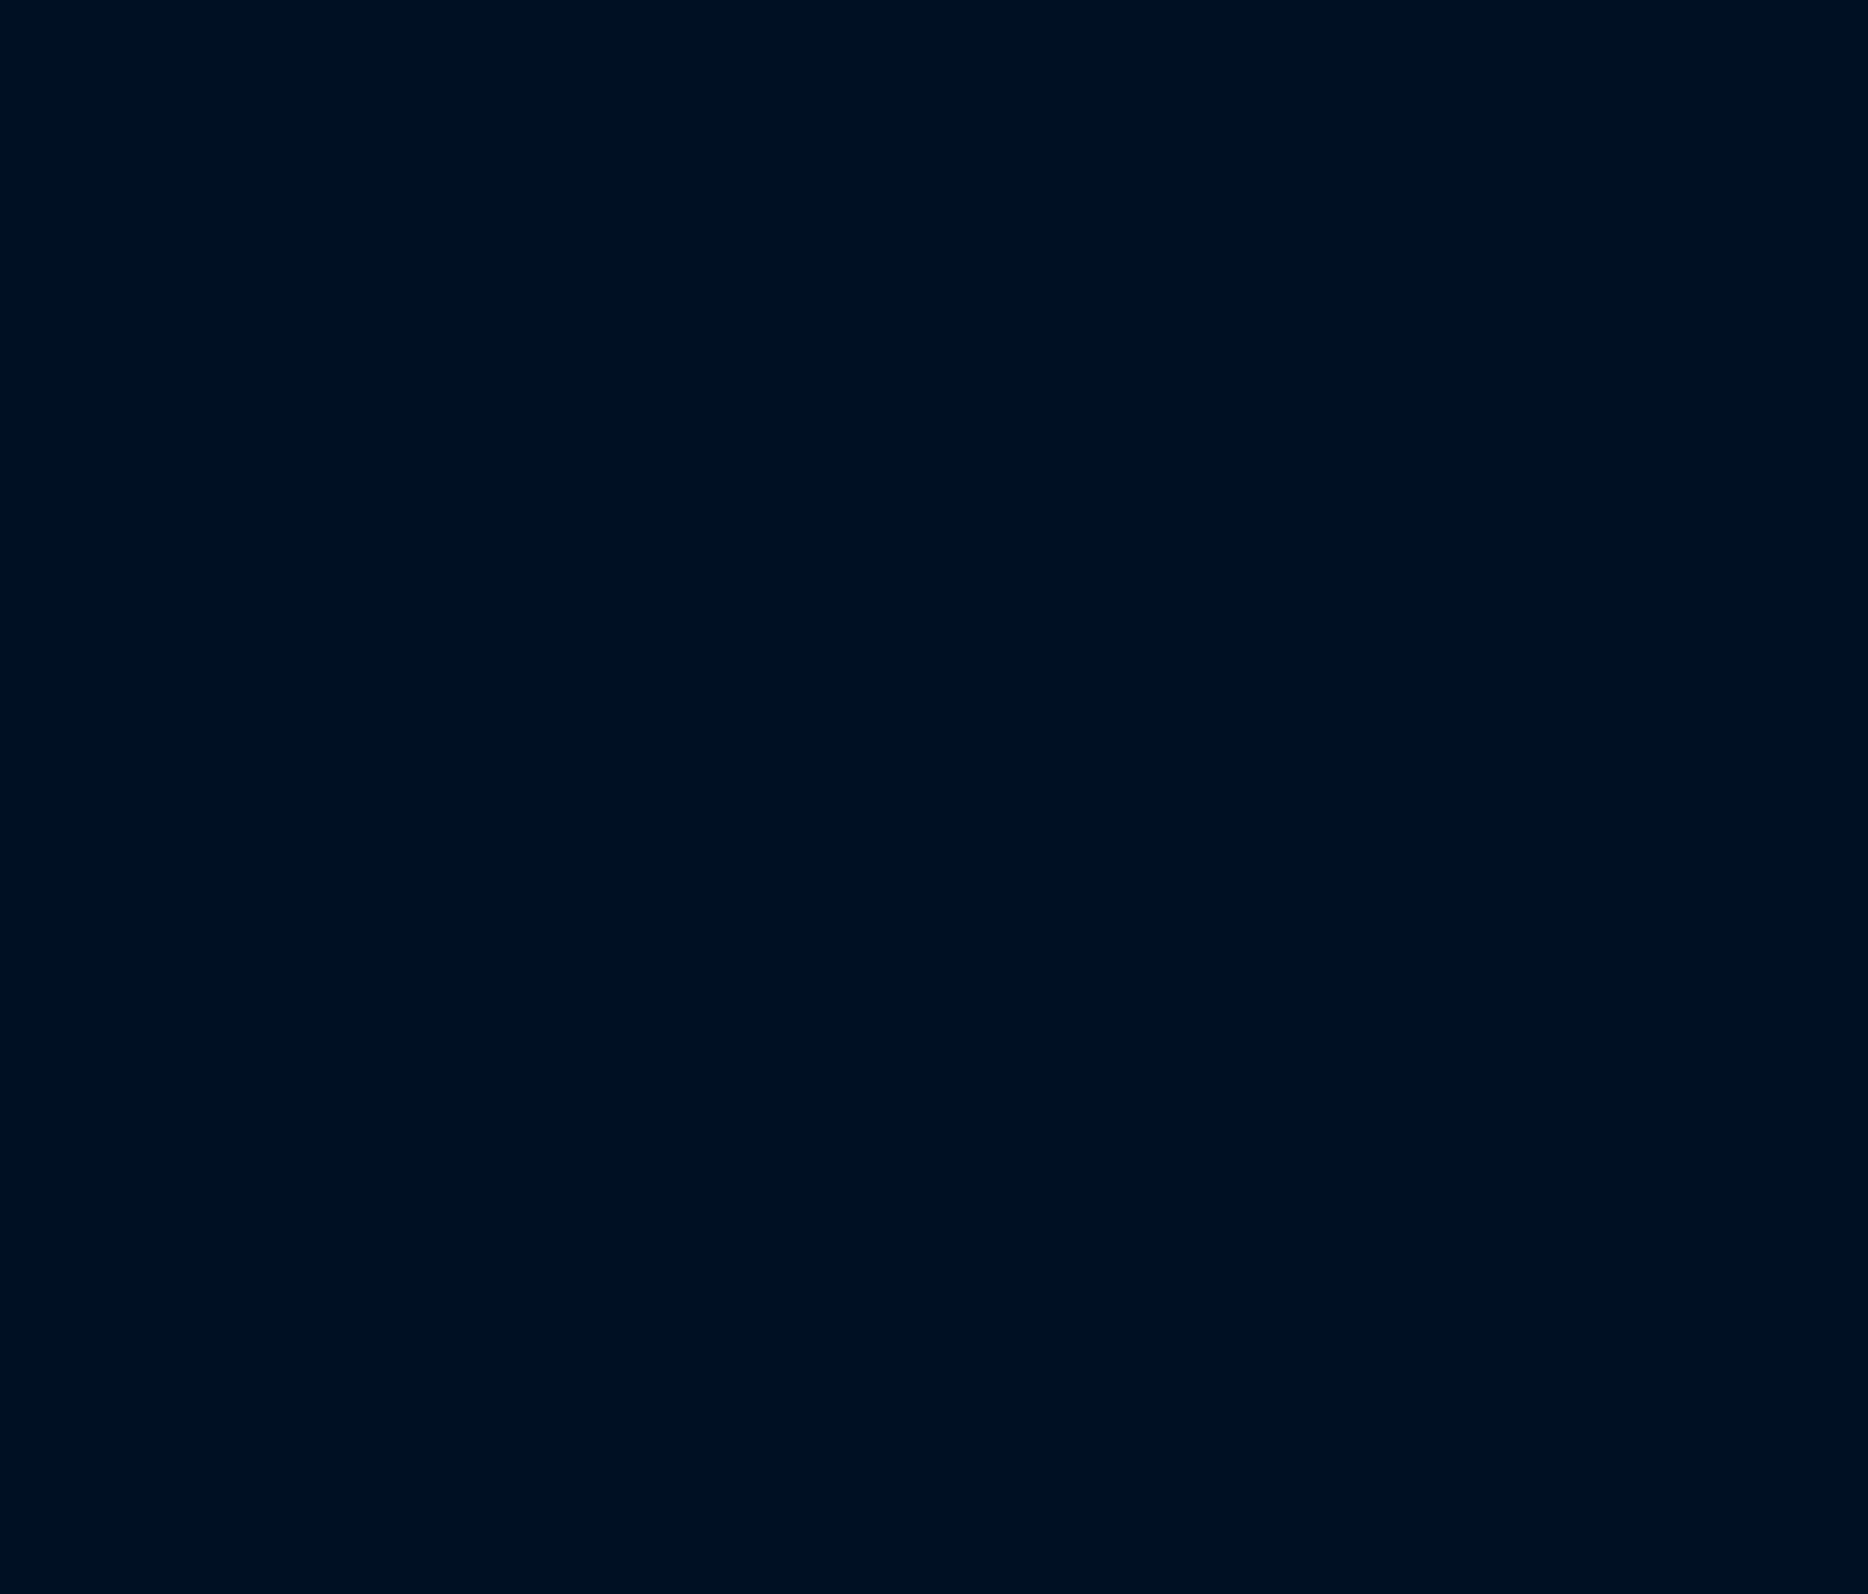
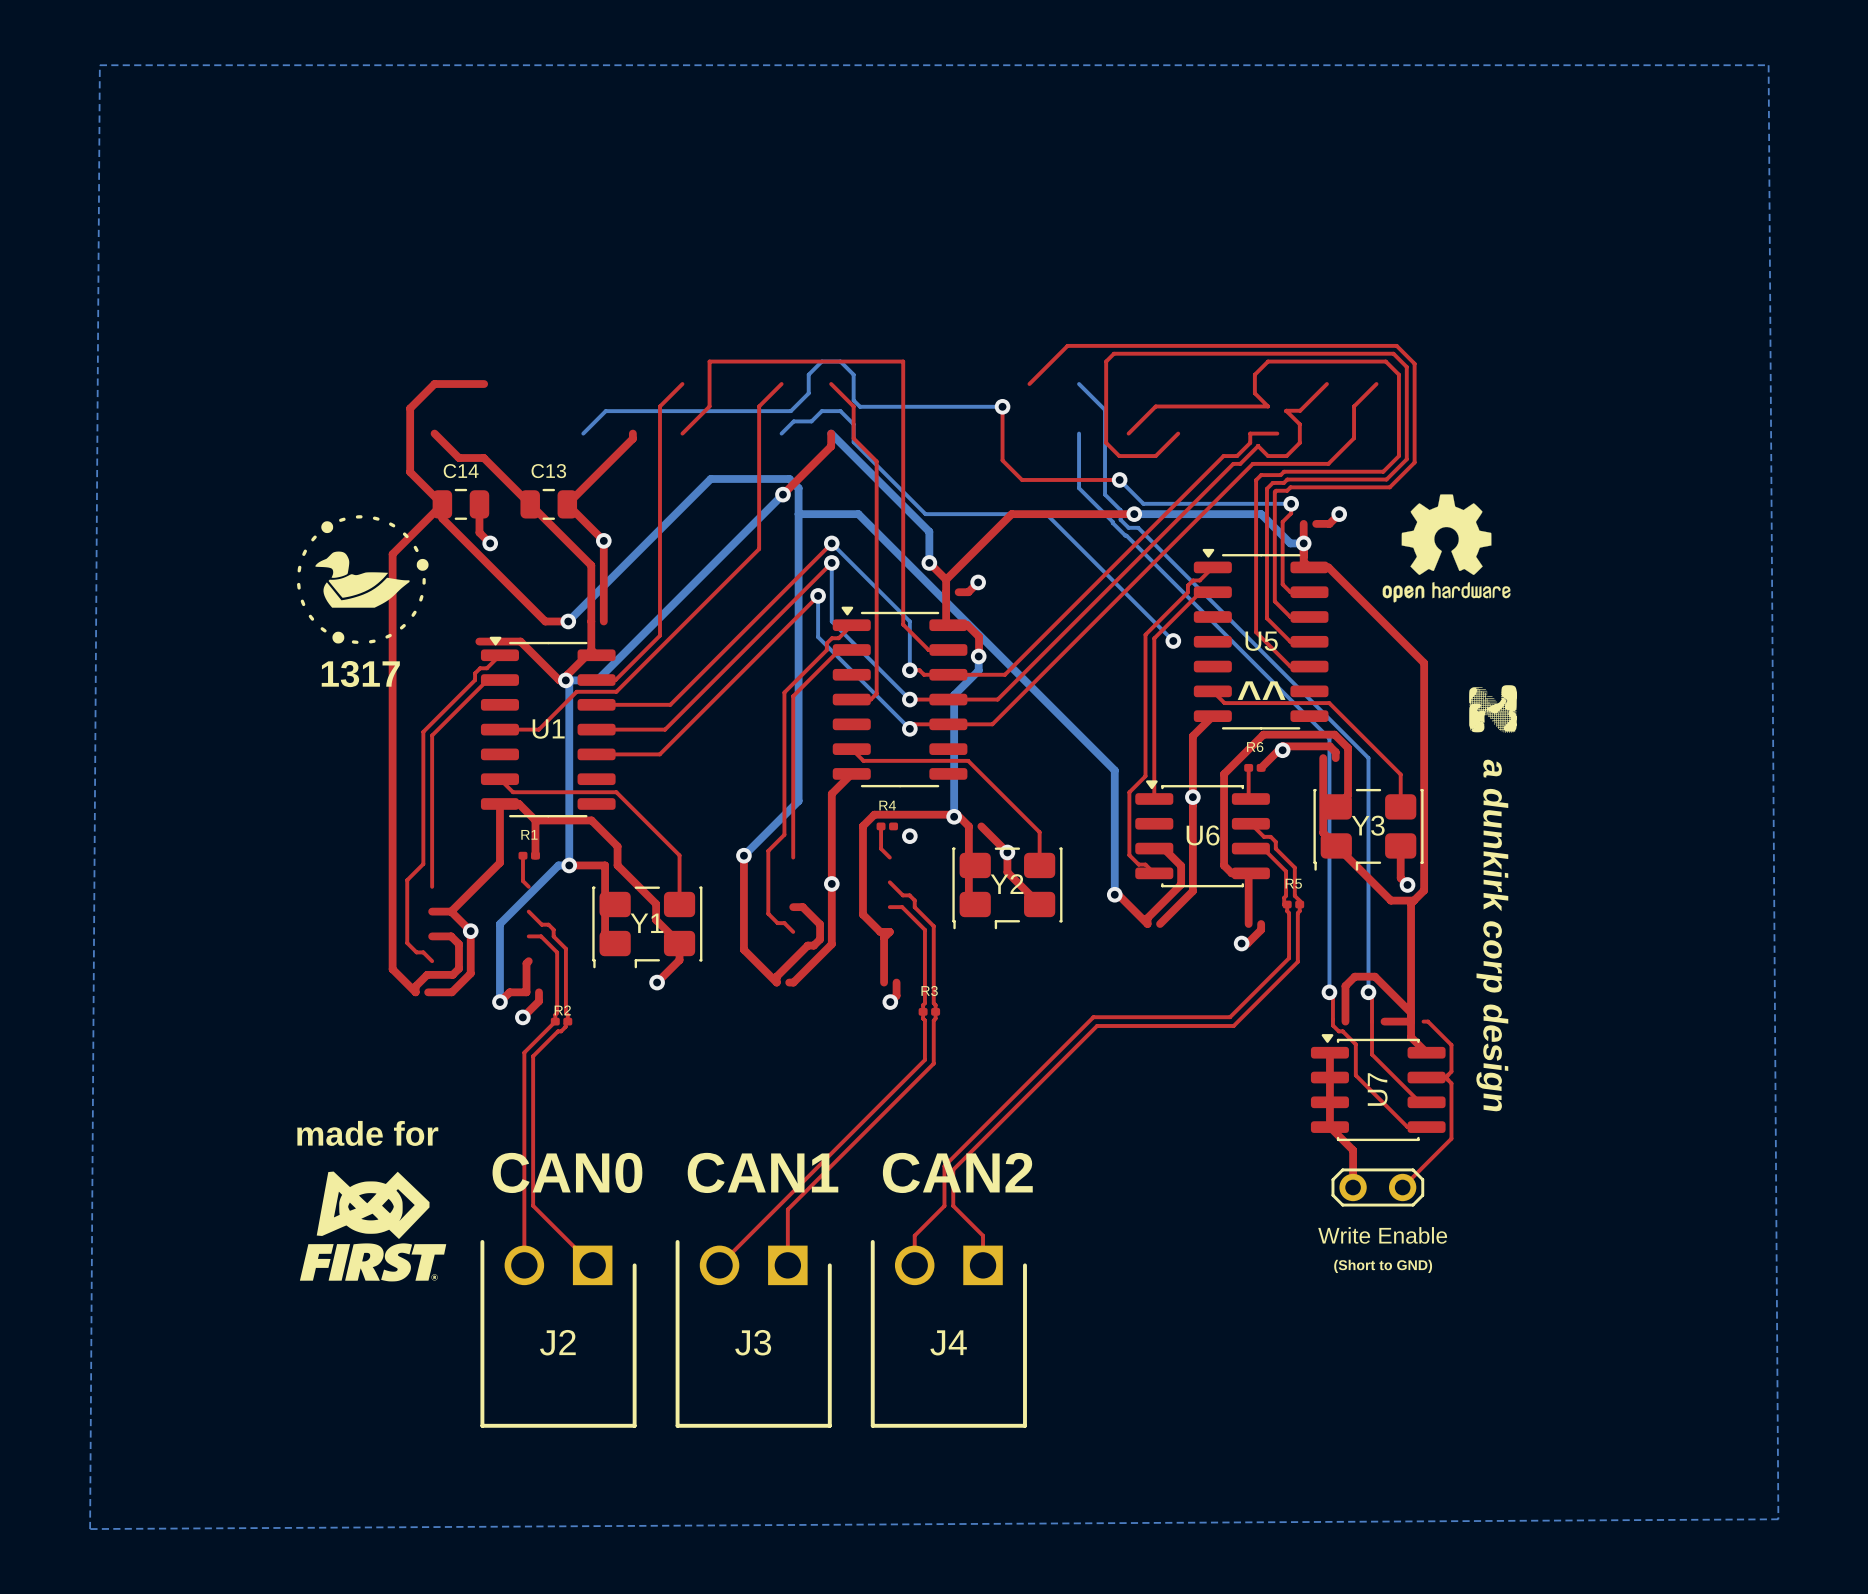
bottom zone outline: none -> (99, 65) (1768, 65) (1778, 1519) (90, 1529) (99, 65)
top track: none -> (484, 384) (434, 384) (410, 408) (410, 472) (442, 504)
top track: none -> (682, 384) (659, 406) (659, 635) (615, 680) (596, 680)
top track: none -> (781, 384) (759, 406) (759, 549) (616, 691) (576, 691) (538, 729) (499, 729)
top track: none -> (831, 384) (853, 406) (853, 438) (876, 461) (876, 693) (870, 699) (851, 699)
top track: none -> (1029, 384) (1067, 345) (1396, 345) (1414, 363) (1414, 462) (1389, 487) (1290, 487) (1287, 490) (1274, 492) (1274, 601) (1290, 616) (1309, 616)
bottom track: none -> (1079, 384) (1105, 409) (1105, 494) (1120, 510) (1120, 519) (1128, 527) (1138, 527) (1368, 758) (1368, 992)
top track: none -> (1326, 384) (1300, 410) (1286, 410)
top track: none -> (1376, 384) (1354, 406) (1354, 438) (1328, 463) (1252, 463) (992, 724) (914, 724) (909, 728)
top track: none -> (1002, 406) (1002, 460) (1022, 479) (1119, 479)
bottom track: none -> (1002, 406) (860, 406) (853, 400) (853, 374) (840, 361) (821, 361) (808, 374) (808, 393) (790, 411) (605, 411) (583, 433)
via: none -> (1002, 406)
top track: none -> (1286, 411) (1299, 424) (1299, 442) (1286, 456) (1268, 456) (1258, 446)
top track: none -> (434, 433) (458, 458) (483, 458) (591, 565) (591, 649) (596, 655) (587, 655) (567, 674) (565, 680) (559, 680) (520, 641) (479, 641)
top track: none -> (632, 433) (632, 438) (567, 504) (603, 540) (603, 621)
top track: none -> (682, 433) (709, 406) (709, 361) (903, 361) (903, 624) (928, 649) (948, 649)
bottom track: none -> (781, 433) (793, 421) (811, 421) (821, 411) (840, 411) (853, 424) (853, 442) (925, 514) (1046, 514) (1173, 641)
top track: none -> (831, 433) (831, 446) (782, 494)
bottom track: none -> (831, 433) (929, 531) (929, 562)
bottom track: none -> (1079, 433) (1079, 488) (1329, 738) (1329, 992)
top track: none -> (1128, 433) (1155, 406) (1268, 406) (1254, 393) (1254, 374) (1268, 361) (1385, 361) (1398, 374) (1398, 456) (1383, 471) (1284, 471) (1280, 475) (1261, 475) (1256, 480) (1256, 632) (1290, 666) (1309, 666)
top track: none -> (1178, 433) (1155, 456) (1119, 456) (1106, 442) (1106, 361) (1113, 353) (1393, 353) (1406, 367) (1406, 459) (1386, 479) (1287, 479) (1283, 482) (1272, 482) (1266, 488) (1266, 618) (1290, 641) (1309, 641)
top track: none -> (1277, 433) (1250, 433) (1250, 442) (1237, 456) (1223, 456) (1004, 674) (924, 674) (919, 670) (909, 670)
top track: none -> (1258, 446) (1240, 463) (1233, 463) (997, 699) (909, 699)
bottom track: none -> (1119, 479) (1143, 503) (1291, 503)
via: none -> (1119, 479)
bottom track: none -> (782, 494) (597, 680) (565, 680) (569, 683) (569, 865) (558, 865) (499, 924) (499, 1002)
via: none -> (782, 494)
drawing: none -> [1382, 494, 1511, 603]
top track: none -> (1291, 503) (1291, 513) (1282, 521) (1282, 584) (1290, 592) (1309, 592)
via: none -> (1291, 503)
top track: none -> (442, 504) (442, 518) (545, 621) (568, 621)
top track: none -> (442, 504) (392, 554) (392, 969) (415, 992) (415, 986) (427, 974) (452, 974) (458, 968) (458, 944) (451, 936) (432, 936)
C14: none -> (460, 504)
top track: none -> (479, 504) (479, 532) (490, 543)
C13: none -> (548, 504)
bottom track: none -> (798, 514) (858, 514) (1114, 770) (1114, 894)
top track: none -> (1134, 514) (1011, 514) (946, 579)
bottom track: none -> (1134, 514) (1261, 514) (1290, 543) (1303, 543)
via: none -> (1134, 514)
top track: none -> (1339, 514) (1329, 523) (1316, 523)
via: none -> (1339, 514)
drawing: none -> [297, 515, 429, 644]
top track: none -> (1303, 523) (1303, 561) (1309, 567) (1328, 567) (1424, 663) (1424, 890) (1411, 903) (1411, 1037) (1426, 1052)
via: none -> (603, 540)
via: none -> (490, 543)
top track: none -> (831, 543) (670, 704) (596, 704)
bottom track: none -> (831, 543) (909, 621) (909, 670)
via: none -> (831, 543)
via: none -> (1303, 543)
top track: none -> (831, 562) (665, 729) (596, 729)
bottom track: none -> (831, 562) (831, 621) (909, 699)
via: none -> (831, 562)
top track: none -> (929, 562) (946, 579)
via: none -> (929, 562)
top track: none -> (1212, 567) (1199, 580) (1193, 580) (1187, 585) (1187, 592) (1145, 634) (1145, 776) (1129, 792) (1129, 855) (1138, 864) (1145, 864) (1154, 873)
top track: none -> (946, 579) (946, 622) (948, 625) (967, 625) (979, 636) (978, 656)
top track: none -> (978, 582) (968, 592) (958, 592)
via: none -> (978, 582)
top track: none -> (1212, 592) (1200, 592) (1154, 638) (1154, 799)
top track: none -> (818, 595) (659, 754) (596, 754)
bottom track: none -> (818, 595) (818, 637) (909, 728)
via: none -> (818, 595)
bottom track: none -> (568, 621) (710, 478) (789, 478) (798, 488) (798, 801) (743, 855)
via: none -> (568, 621)
top track: none -> (851, 625) (838, 638) (831, 638) (826, 643) (826, 650) (784, 692) (784, 834) (768, 850) (768, 913) (777, 923) (784, 923) (793, 931)
part: none -> (1261, 639)
via: none -> (1173, 641)
text: none -> U5 (1261, 641)
top track: none -> (851, 649) (839, 649) (793, 696) (793, 857)
top track: none -> (499, 655) (486, 668) (480, 668) (475, 673) (475, 680) (423, 731) (423, 864) (407, 880) (407, 943) (416, 952) (423, 952) (432, 961)
bottom track: none -> (978, 656) (978, 670) (954, 695) (954, 816)
via: none -> (978, 656)
via: none -> (909, 670)
text: none -> 1317 (360, 674)
top track: none -> (499, 680) (487, 680) (432, 735) (432, 886)
via: none -> (565, 680)
text: none -> ^^ (1261, 690)
drawing: none -> [1469, 685, 1518, 733]
top track: none -> (1212, 691) (1224, 703) (1329, 703) (1400, 774) (1400, 806)
part: none -> (900, 696)
via: none -> (909, 699)
top track: none -> (1212, 716) (1192, 736) (1192, 891) (1160, 924)
part: none -> (548, 727)
text: none -> U1 (548, 729)
via: none -> (909, 728)
top track: none -> (1282, 746) (1329, 746) (1335, 752) (1335, 758)
top track: none -> (1282, 746) (1261, 767)
top track: none -> (851, 749) (863, 760) (968, 760) (1039, 832) (1039, 865)
via: none -> (1282, 750)
top track: none -> (1323, 758) (1323, 832) (1390, 900) (1414, 900)
top track: none -> (1248, 767) (1248, 796) (1250, 799)
R6: none -> (1254, 767)
top track: none -> (851, 773) (831, 793) (831, 944) (793, 982) (789, 982)
top track: none -> (499, 779) (513, 792) (616, 792) (679, 855) (679, 904)
via: none -> (1192, 797)
top track: none -> (1336, 806) (1348, 795) (1348, 747) (1334, 734) (1263, 734) (1224, 774) (1224, 865) (1231, 873) (1250, 873) (1248, 875) (1248, 924)
top track: none -> (957, 814) (968, 826) (968, 898) (975, 904)
top track: none -> (957, 814) (874, 814) (862, 826) (862, 914) (880, 931) (889, 931) (884, 937) (884, 982)
via: none -> (954, 816)
top track: none -> (535, 820) (591, 820) (617, 846) (617, 865) (656, 903) (656, 920) (679, 943) (679, 960) (657, 982)
top track: none -> (535, 820) (518, 803) (499, 803) (499, 862) (451, 911)
top track: none -> (535, 820) (535, 855)
top track: none -> (1250, 823) (1263, 836) (1270, 836) (1275, 841) (1275, 848) (1294, 867) (1294, 895) (1299, 900) (1297, 961) (1233, 1025) (1097, 1025) (953, 1169) (953, 1205) (983, 1235) (983, 1265)
top track: none -> (881, 826) (881, 848) (889, 857)
R4: none -> (887, 826)
top track: none -> (981, 826) (1007, 852) (1007, 872) (1039, 904)
Y3: none -> (1368, 829)
U6: none -> (1202, 833)
via: none -> (909, 836)
top track: none -> (1400, 845) (1400, 878) (1407, 884)
top track: none -> (1154, 848) (1163, 848) (1181, 865) (1181, 884) (1147, 918) (1147, 924) (1118, 894) (1114, 894)
top track: none -> (1250, 848) (1263, 848) (1286, 871) (1284, 905)
via: none -> (1007, 852)
top track: none -> (522, 855) (522, 881) (528, 886)
R1: none -> (529, 855)
top track: none -> (743, 855) (743, 949) (776, 982) (776, 976) (807, 945) (813, 945) (820, 939) (820, 924) (802, 907) (793, 907)
via: none -> (743, 855)
top track: none -> (569, 865) (605, 865) (605, 933) (615, 943)
via: none -> (569, 865)
top track: none -> (889, 882) (902, 895) (909, 895) (914, 900) (914, 907) (933, 926) (933, 1003) (935, 1005) (933, 1063) (787, 1209) (787, 1265)
via: none -> (831, 883)
via: none -> (1407, 884)
Y2: none -> (1007, 888)
via: none -> (1114, 894)
top track: none -> (1287, 904) (1289, 913) (1289, 958) (1230, 1017) (1093, 1017) (944, 1166) (944, 1205) (914, 1235) (914, 1265)
R5: none -> (1293, 904)
top track: none -> (889, 907) (902, 907) (924, 929) (924, 1003) (923, 1005) (924, 1059) (719, 1265)
top track: none -> (432, 911) (451, 911)
top track: none -> (451, 911) (470, 931) (470, 973) (451, 992) (428, 992)
top track: none -> (528, 911) (541, 924) (548, 924) (553, 929) (553, 936) (565, 948) (565, 1013) (567, 1014) (565, 1026) (561, 1031) (558, 1031) (533, 1056) (533, 1205) (592, 1265)
top track: none -> (1261, 924) (1261, 929) (1247, 943) (1241, 943)
Y1: none -> (647, 927)
via: none -> (470, 931)
top track: none -> (528, 936) (541, 936) (557, 952) (557, 1013) (555, 1021) (524, 1052) (524, 1265)
via: none -> (1241, 943)
text: none -> a dunkirk corp design (1492, 935)
top track: none -> (528, 961) (526, 963) (526, 992) (509, 992) (499, 1002)
via: none -> (657, 982)
top track: none -> (896, 982) (896, 995) (890, 1002)
top track: none -> (539, 992) (539, 1001) (522, 1017)
top track: none -> (1329, 992) (1332, 995) (1332, 1025) (1338, 1031) (1342, 1031) (1355, 1044) (1355, 1075) (1407, 1127) (1426, 1127)
via: none -> (1329, 992)
top track: none -> (1368, 992) (1372, 995) (1372, 1054) (1419, 1102) (1426, 1102)
via: none -> (1368, 992)
via: none -> (499, 1002)
via: none -> (890, 1002)
R3: none -> (929, 1011)
top track: none -> (1411, 1012) (1374, 976) (1354, 976) (1345, 986) (1345, 1021)
via: none -> (522, 1017)
R2: none -> (561, 1021)
top track: none -> (1384, 1021) (1411, 1021)
top track: none -> (1423, 1021) (1428, 1021) (1451, 1045) (1451, 1071) (1445, 1077) (1451, 1083) (1451, 1138) (1402, 1187)
top track: none -> (1329, 1052) (1329, 1127) (1353, 1150) (1353, 1187)
part: none -> (1378, 1087)
text: none -> U7 (1377, 1089)
text: none -> made for (367, 1133)
drawing: none -> [299, 1171, 447, 1282]
text: none -> CAN0 (567, 1172)
text: none -> CAN1 (763, 1172)
text: none -> CAN2 (957, 1172)
part: none -> (1377, 1187)
text: none -> Write Enable (1382, 1235)
text: none -> (Short to GND) (1383, 1266)
J2: none -> (558, 1333)
J3: none -> (753, 1333)
J4: none -> (948, 1333)

